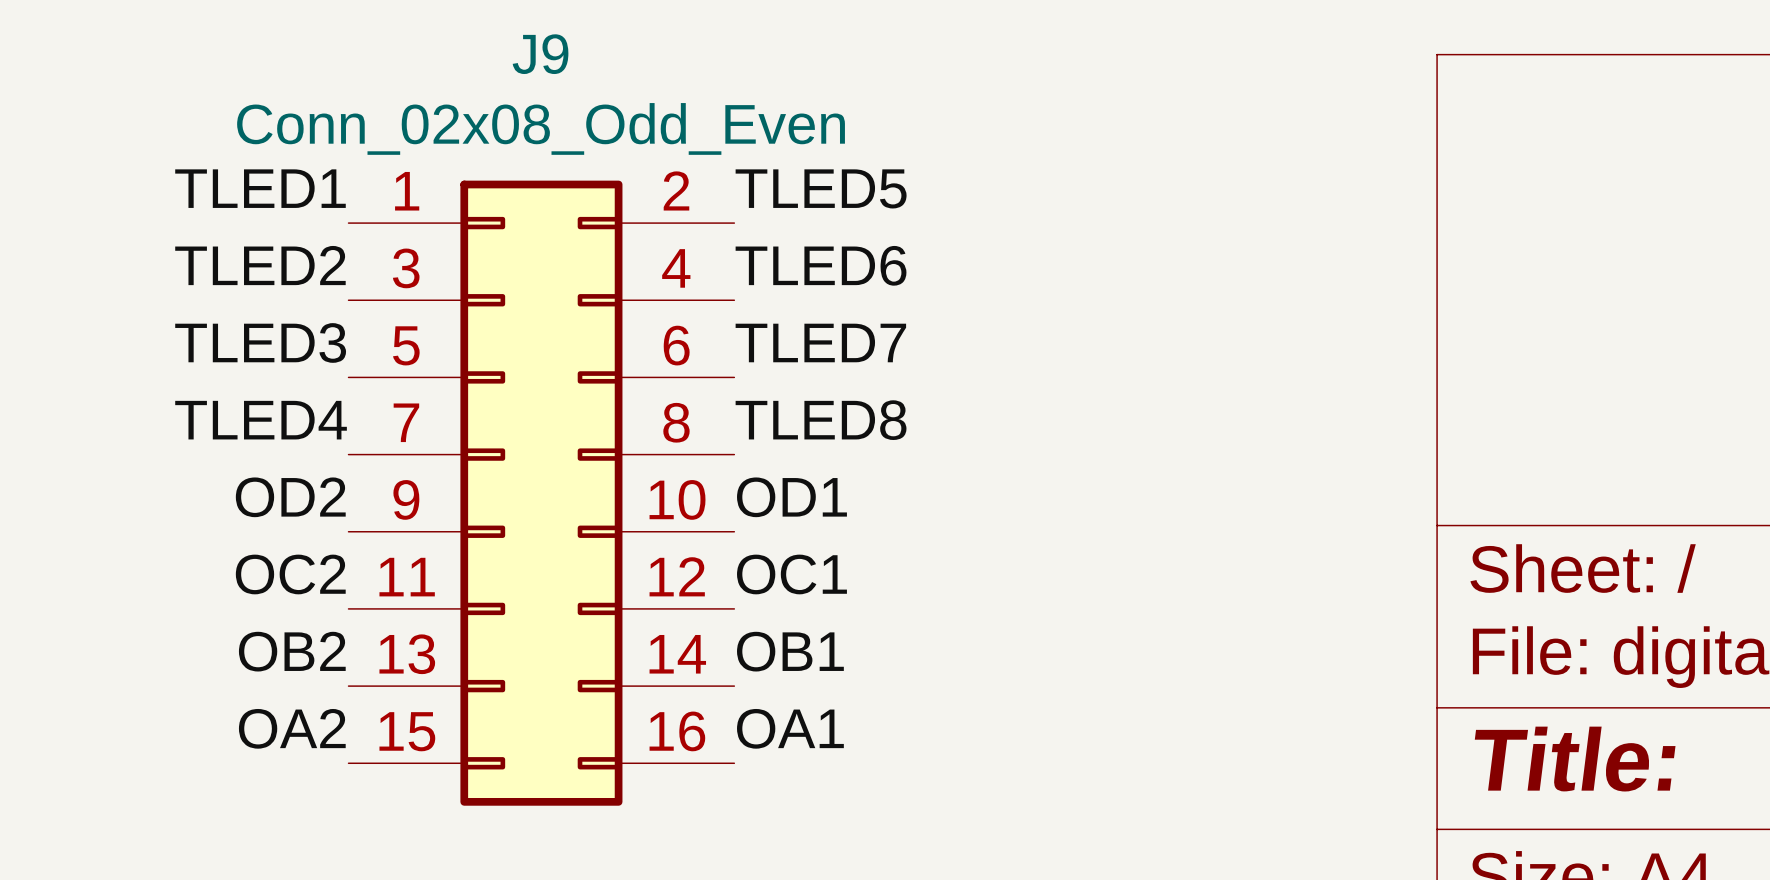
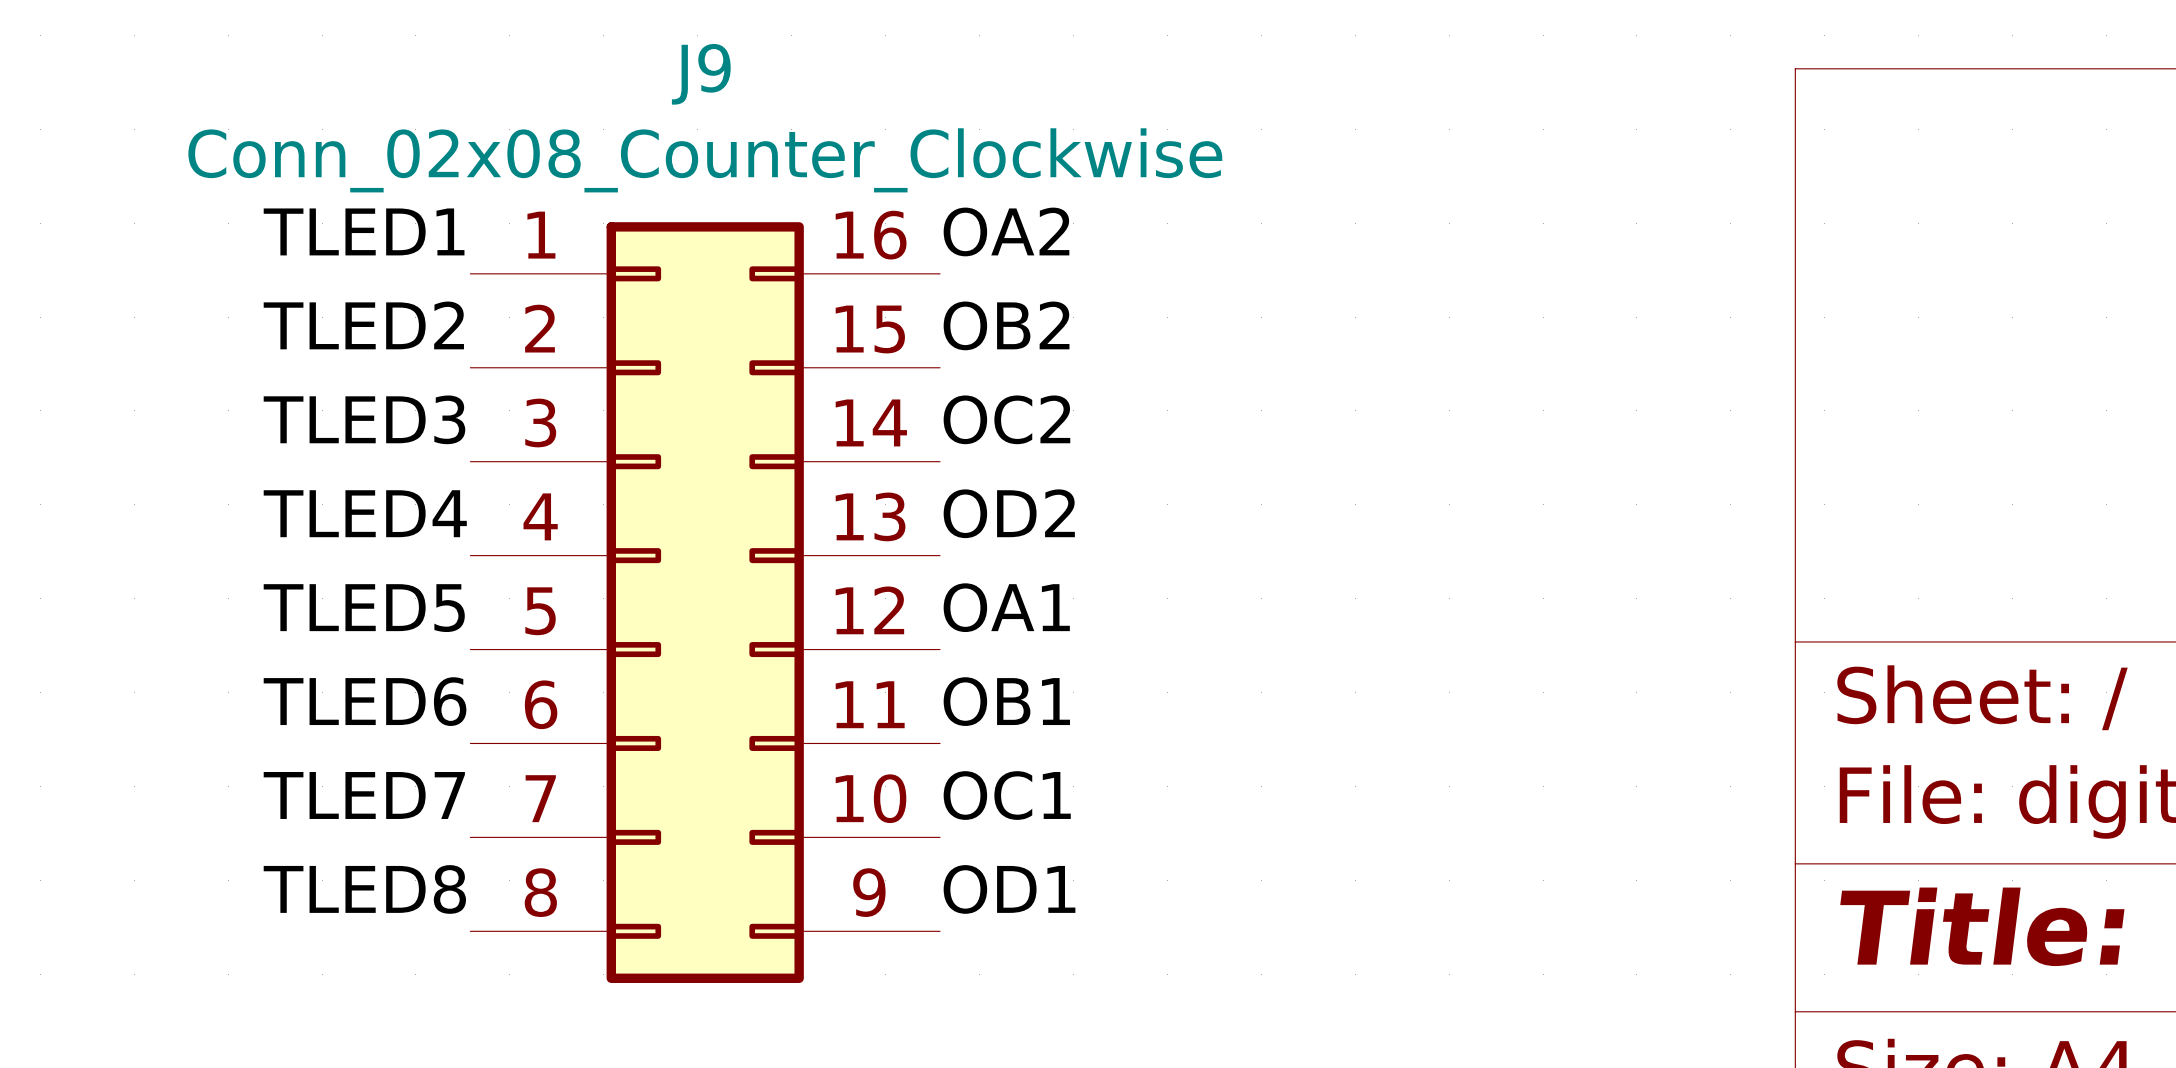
J9 value: Conn_02x08_Odd_Even (541, 128) -> Conn_02x08_Counter_Clockwise (705, 160)
J9 symbol: [348, 180, 735, 806] -> [470, 222, 941, 983]
label: TLED5 (821, 188) -> OA2 (1006, 231)
label: TLED6 (821, 265) -> OB2 (1006, 325)
label: TLED7 (820, 342) -> OC2 (1006, 419)
label: TLED8 (821, 420) -> OD2 (1009, 513)
label: OD2 (290, 497) -> TLED5 (364, 608)
label: OD1 (791, 497) -> OA1 (1006, 607)
label: OC2 (290, 574) -> TLED6 (365, 701)
label: OC1 (791, 574) -> OB1 (1006, 701)
label: OB2 (292, 651) -> TLED7 (364, 795)
label: OB1 (790, 651) -> OC1 (1007, 795)
label: OA2 (292, 728) -> TLED8 (364, 889)
label: OA1 (790, 728) -> OD1 (1009, 889)

